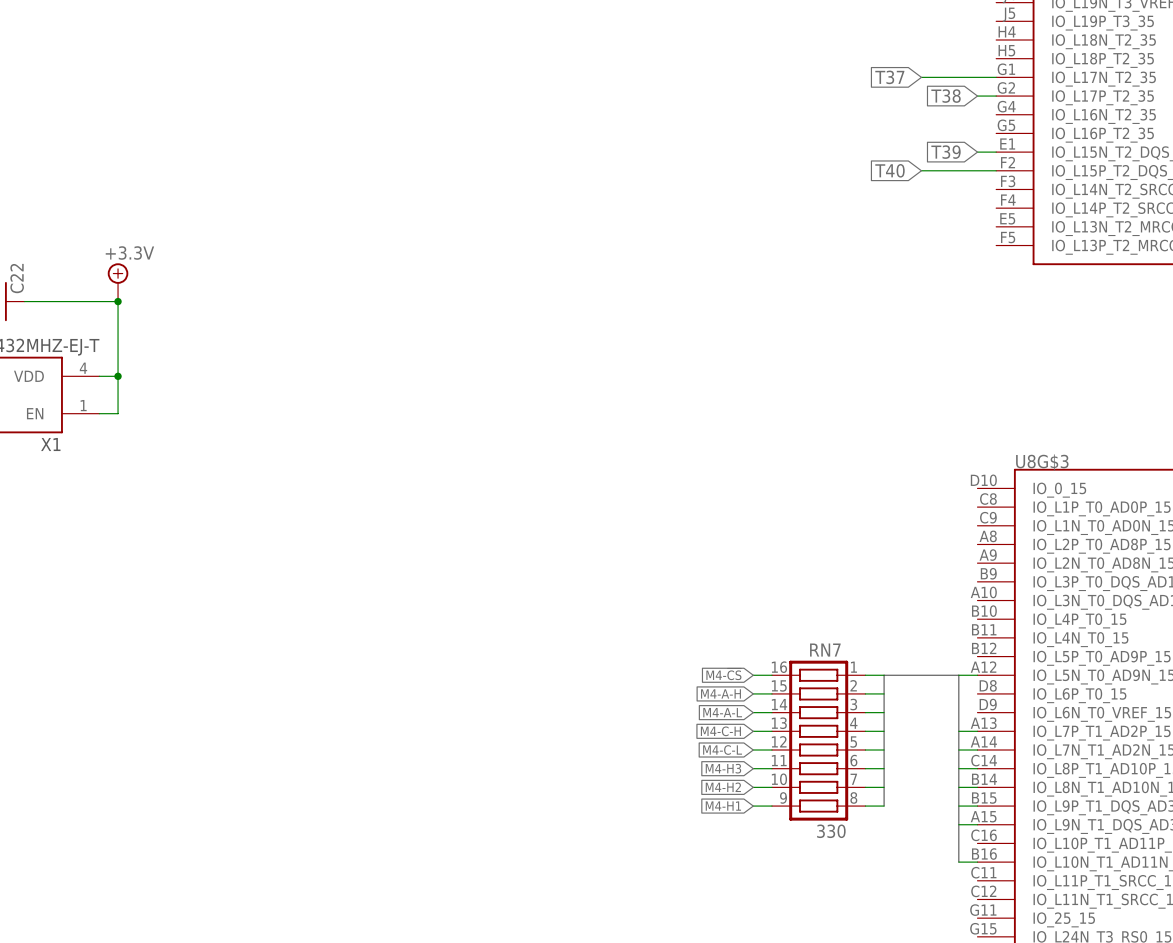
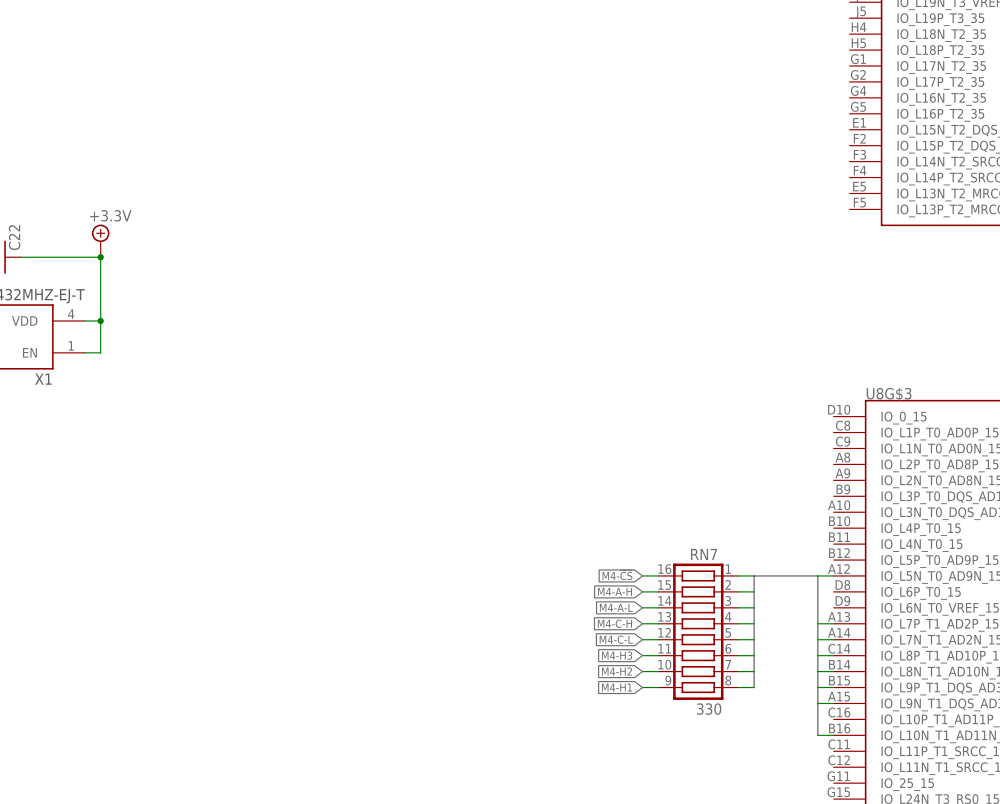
global label: T37 (889, 77) -> none
wire: (921, 77) (996, 77) -> none
global label: T38 (946, 96) -> none
wire: (977, 96) (996, 96) -> none
global label: T39 (946, 152) -> none
wire: (977, 152) (996, 152) -> none
global label: T40 (889, 170) -> none
wire: (921, 170) (996, 170) -> none

